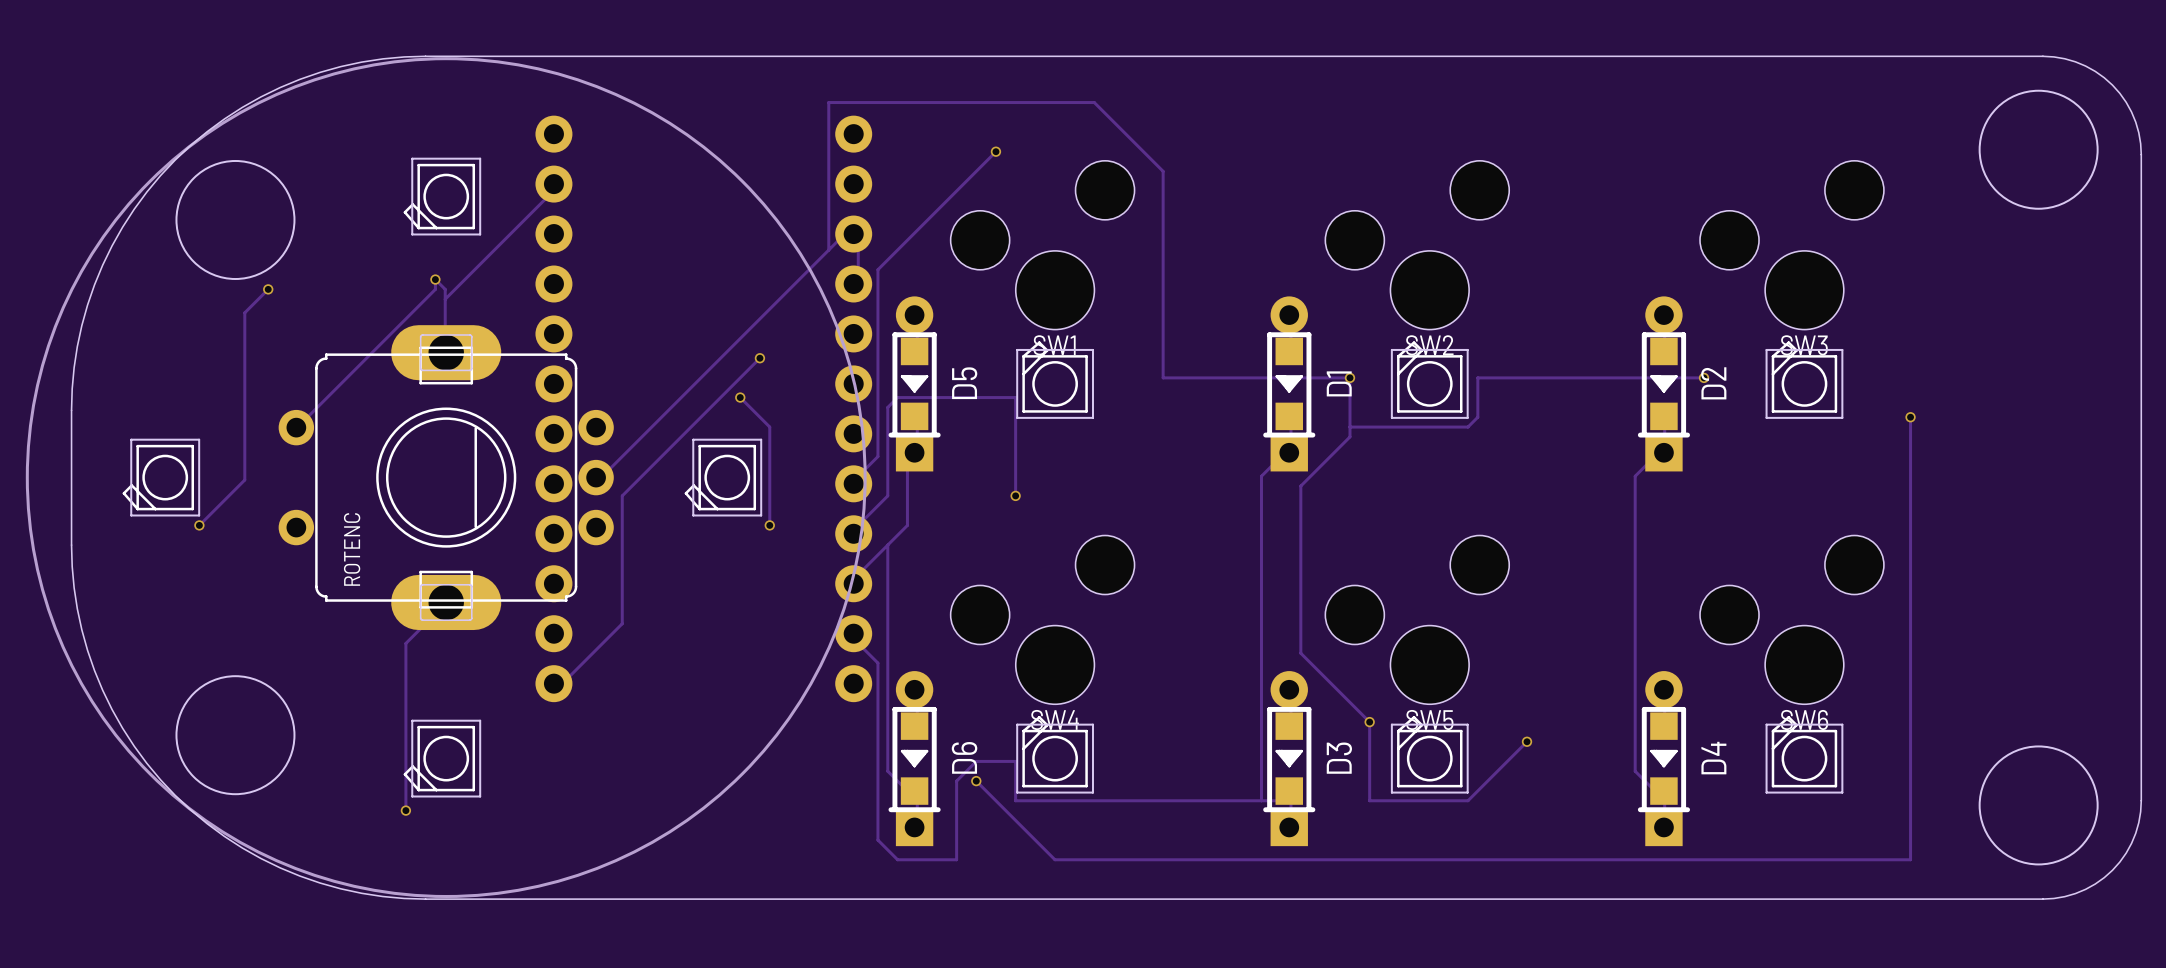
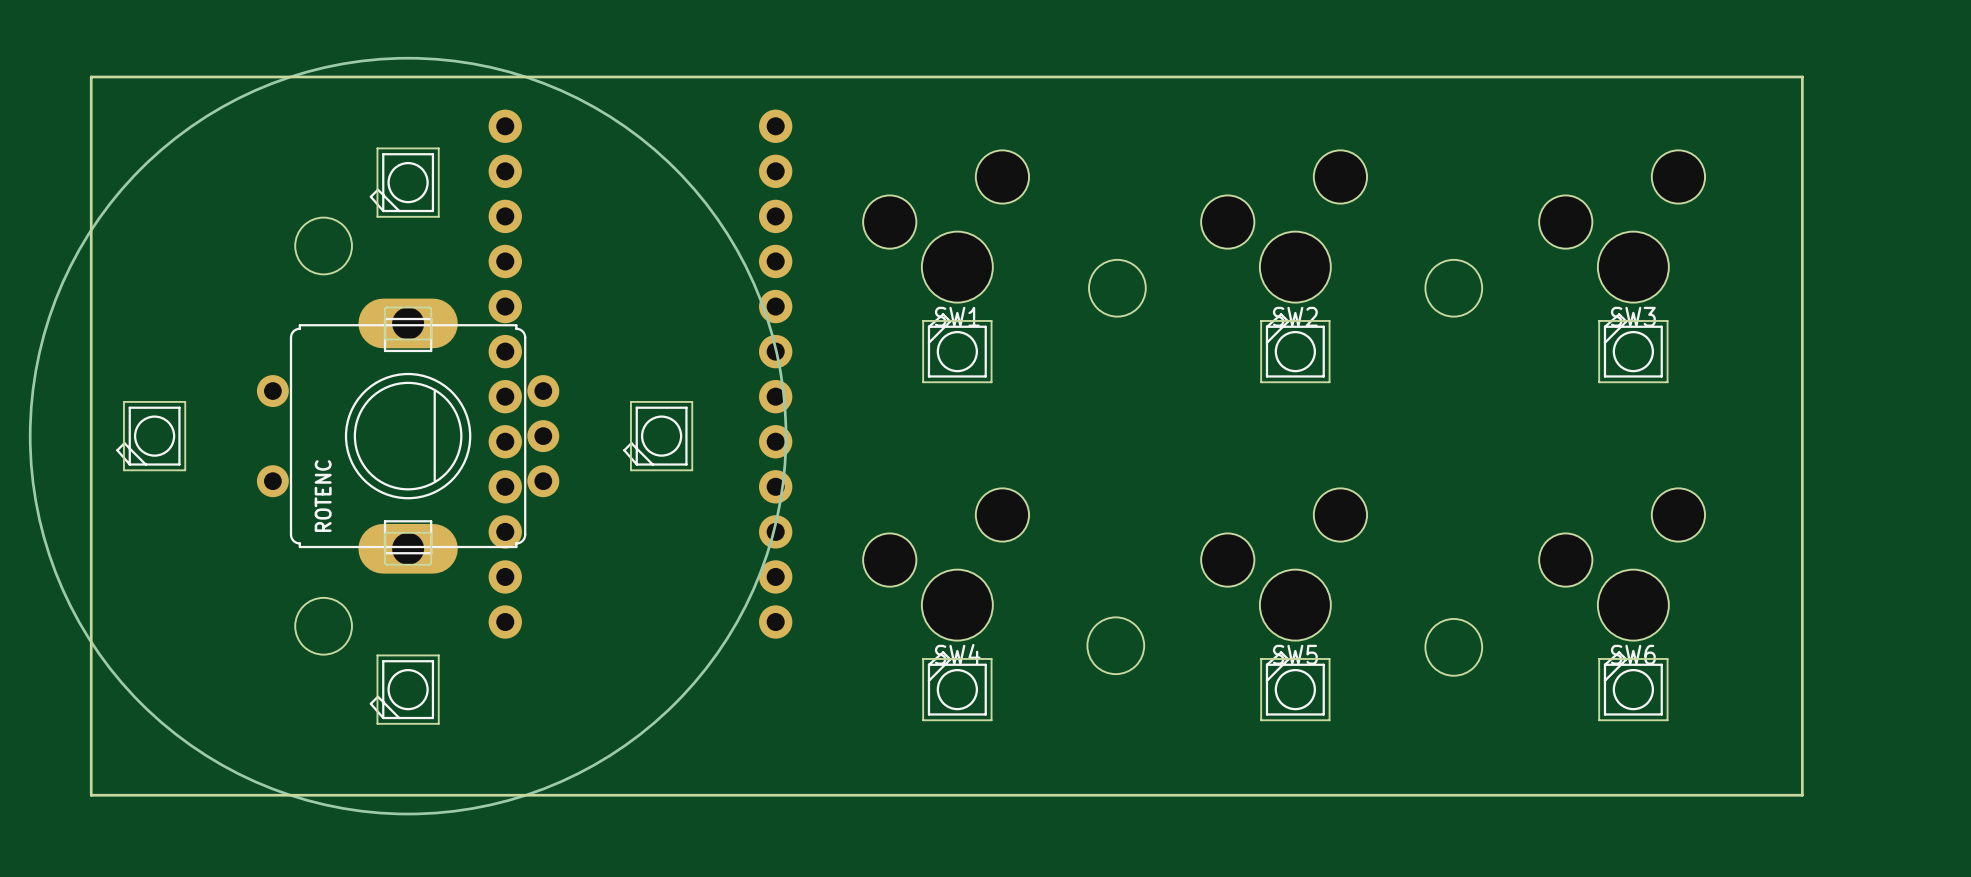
board edge: (425, 56) (2042, 56) (2064, 58) (2085, 66) (2104, 77) (2126, 102) (2135, 122) (2140, 143) (2141, 800) (2138, 822) (2131, 843) (2112, 870) (2095, 884) (2075, 893) (2042, 899) (425, 899) (382, 896) (340, 888) (280, 867) (224, 836) (190, 810) (160, 779) (122, 728) (94, 670) (81, 629) (72, 566) (71, 410) (77, 346) (94, 284) (122, 227) (160, 175) (190, 145) (242, 107) (300, 79) (361, 62) (425, 56) -> (91, 76) (91, 795) (1802, 795) (1802, 76) (91, 76)
round board edge: [1978, 89, 2099, 210] -> none
track: (995, 151) (877, 269) (877, 456) (858, 476) (853, 483) -> none
via: (995, 151) -> none
round board edge: [175, 160, 296, 280] -> none
track: (553, 184) (553, 191) (445, 299) -> none
round board edge: none -> [294, 216, 353, 276]
track: (828, 250) (828, 102) (1094, 102) (1163, 171) (1163, 377) (1349, 377) (1349, 436) (1300, 486) (1300, 653) (1369, 722) (1369, 800) (1468, 800) (1527, 741) -> none
via: (435, 279) -> none
round board edge: none -> [1088, 258, 1147, 318]
round board edge: none -> [1424, 258, 1484, 318]
track: (853, 284) (858, 279) (858, 240) (848, 230) (602, 476) (596, 477) -> none
track: (268, 289) (244, 312) (244, 479) (199, 525) -> none
via: (268, 289) -> none
track: (446, 352) (445, 289) (435, 279) (435, 289) (296, 427) -> none
track: (759, 358) (622, 495) (622, 623) (563, 682) (553, 683) -> none
via: (759, 358) -> none
via: (1349, 377) -> none
track: (1704, 377) (1477, 377) (1477, 417) (1468, 427) (1349, 427) -> none
via: (1704, 377) -> none
D5: (914, 383) -> none
D1: (1289, 383) -> none
D2: (1663, 383) -> none
track: (740, 397) (769, 427) (769, 525) -> none
via: (740, 397) -> none
track: (914, 416) (917, 417) (917, 446) (914, 452) (907, 456) (907, 525) (858, 574) (853, 583) -> none
track: (1289, 416) (1290, 417) (1289, 452) (1281, 456) (1261, 476) (1261, 800) -> none
track: (1663, 416) (1663, 452) (1654, 456) (1635, 476) (1635, 771) (1654, 790) (1663, 791) (1663, 827) -> none
track: (1910, 417) (1910, 859) (1054, 859) (976, 781) -> none
via: (1910, 417) -> none
track: (1015, 495) (1015, 397) (897, 397) (887, 407) (887, 495) (858, 525) (853, 533) -> none
via: (1015, 495) -> none
via: (199, 525) -> none
via: (769, 525) -> none
track: (887, 545) (887, 771) (907, 790) (914, 791) (917, 800) (917, 820) (914, 827) -> none
track: (446, 602) (405, 643) (405, 810) -> none
track: (853, 633) (858, 643) (877, 663) (877, 840) (897, 859) (956, 859) (956, 781) (976, 761) (1015, 761) (1015, 800) (1281, 800) (1289, 791) (1290, 800) (1289, 827) -> none
round board edge: none -> [294, 596, 353, 656]
round board edge: [175, 675, 296, 796] -> none
round board edge: none -> [1086, 616, 1146, 676]
round board edge: none -> [1424, 618, 1484, 677]
via: (1369, 722) -> none
via: (1527, 741) -> none
round board edge: [1978, 745, 2099, 866] -> none
D6: (914, 758) -> none
D3: (1289, 758) -> none
D4: (1663, 758) -> none
via: (976, 781) -> none
via: (405, 810) -> none

